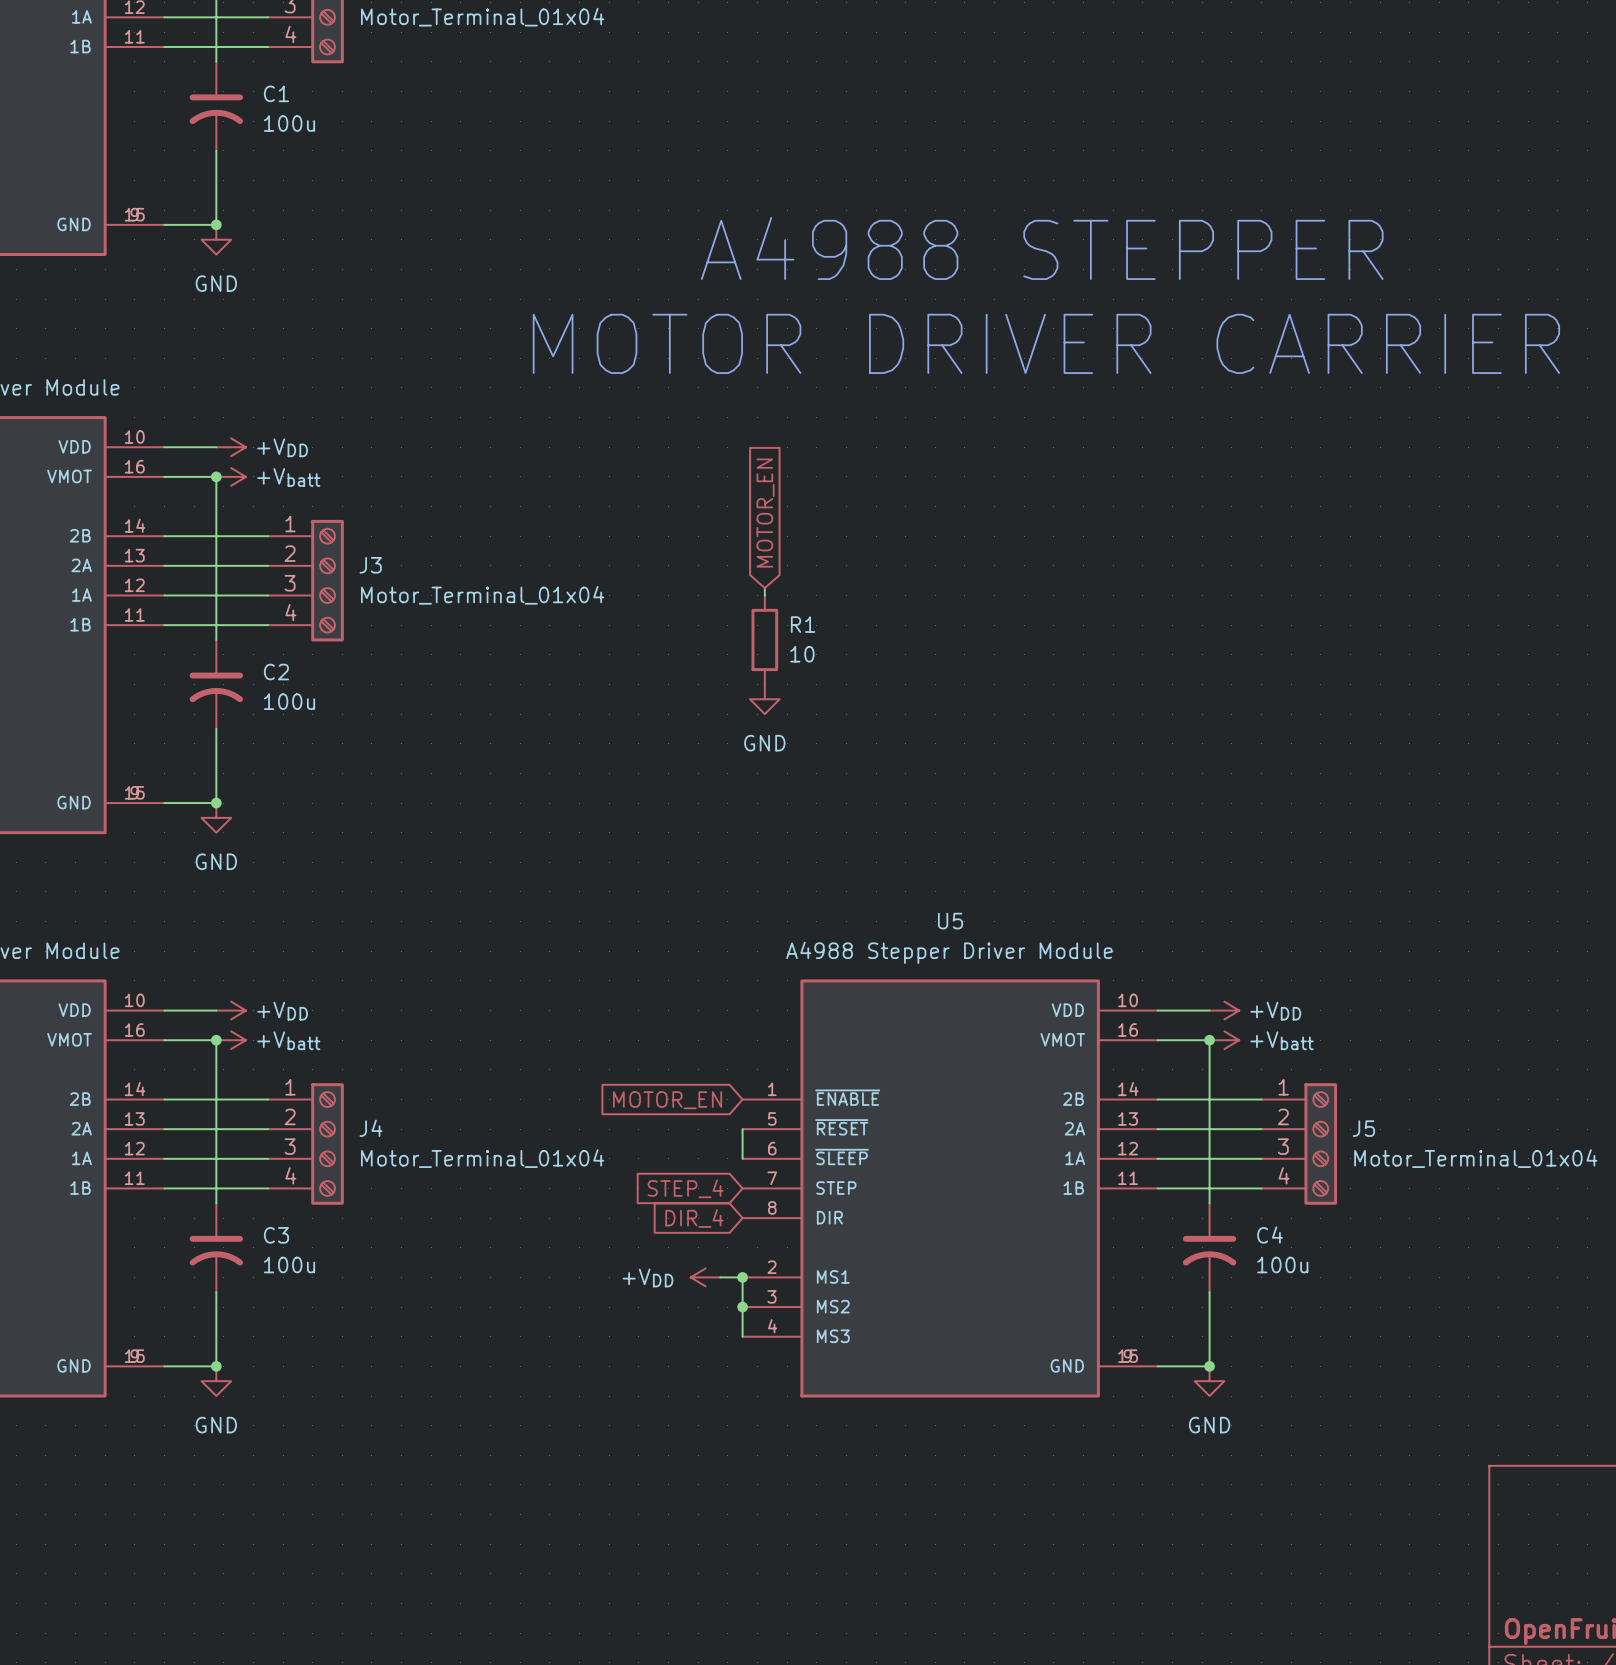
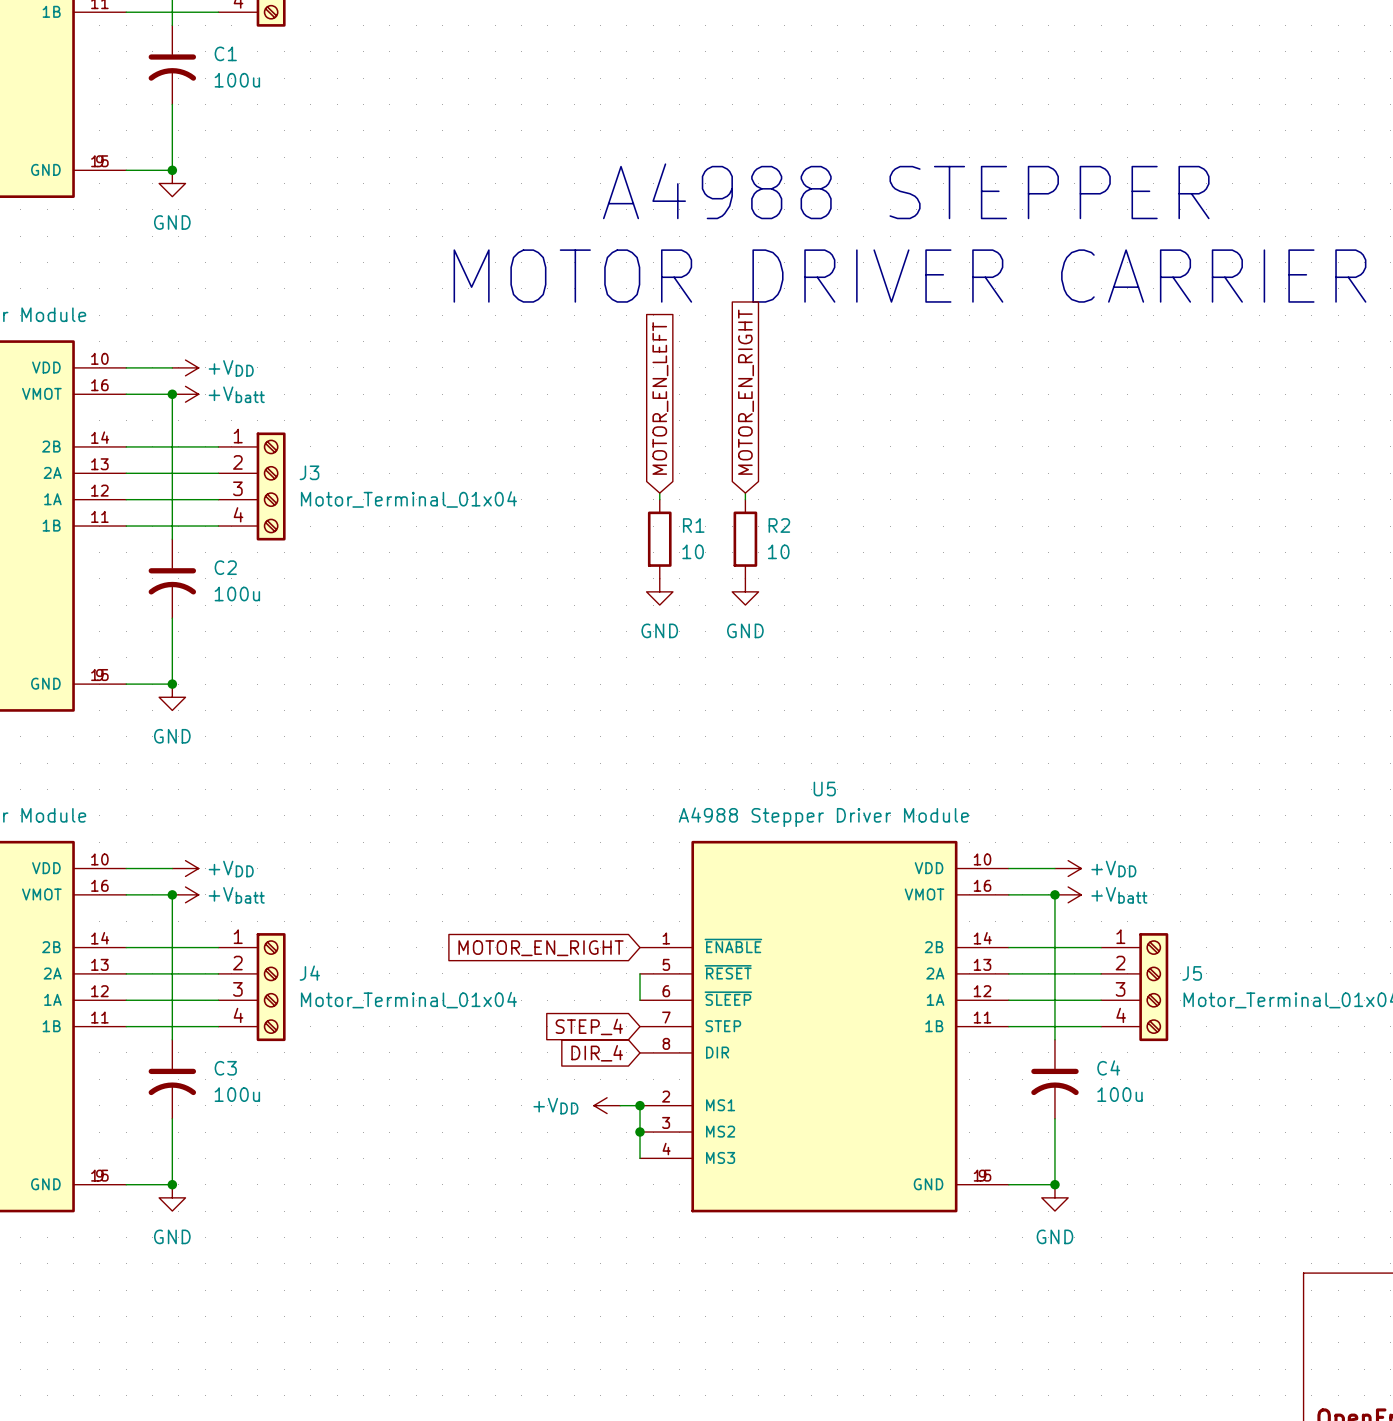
global label: none -> MOTOR_EN_RIGHT (746, 392)
global label: MOTOR_EN (765, 513) -> MOTOR_EN_LEFT (660, 398)
wire: none -> (745, 493) (745, 499)
R2: none -> 10 (745, 539)
power symbol: none -> GND (745, 591)
global label: MOTOR_EN (667, 1100) -> MOTOR_EN_RIGHT (541, 948)

